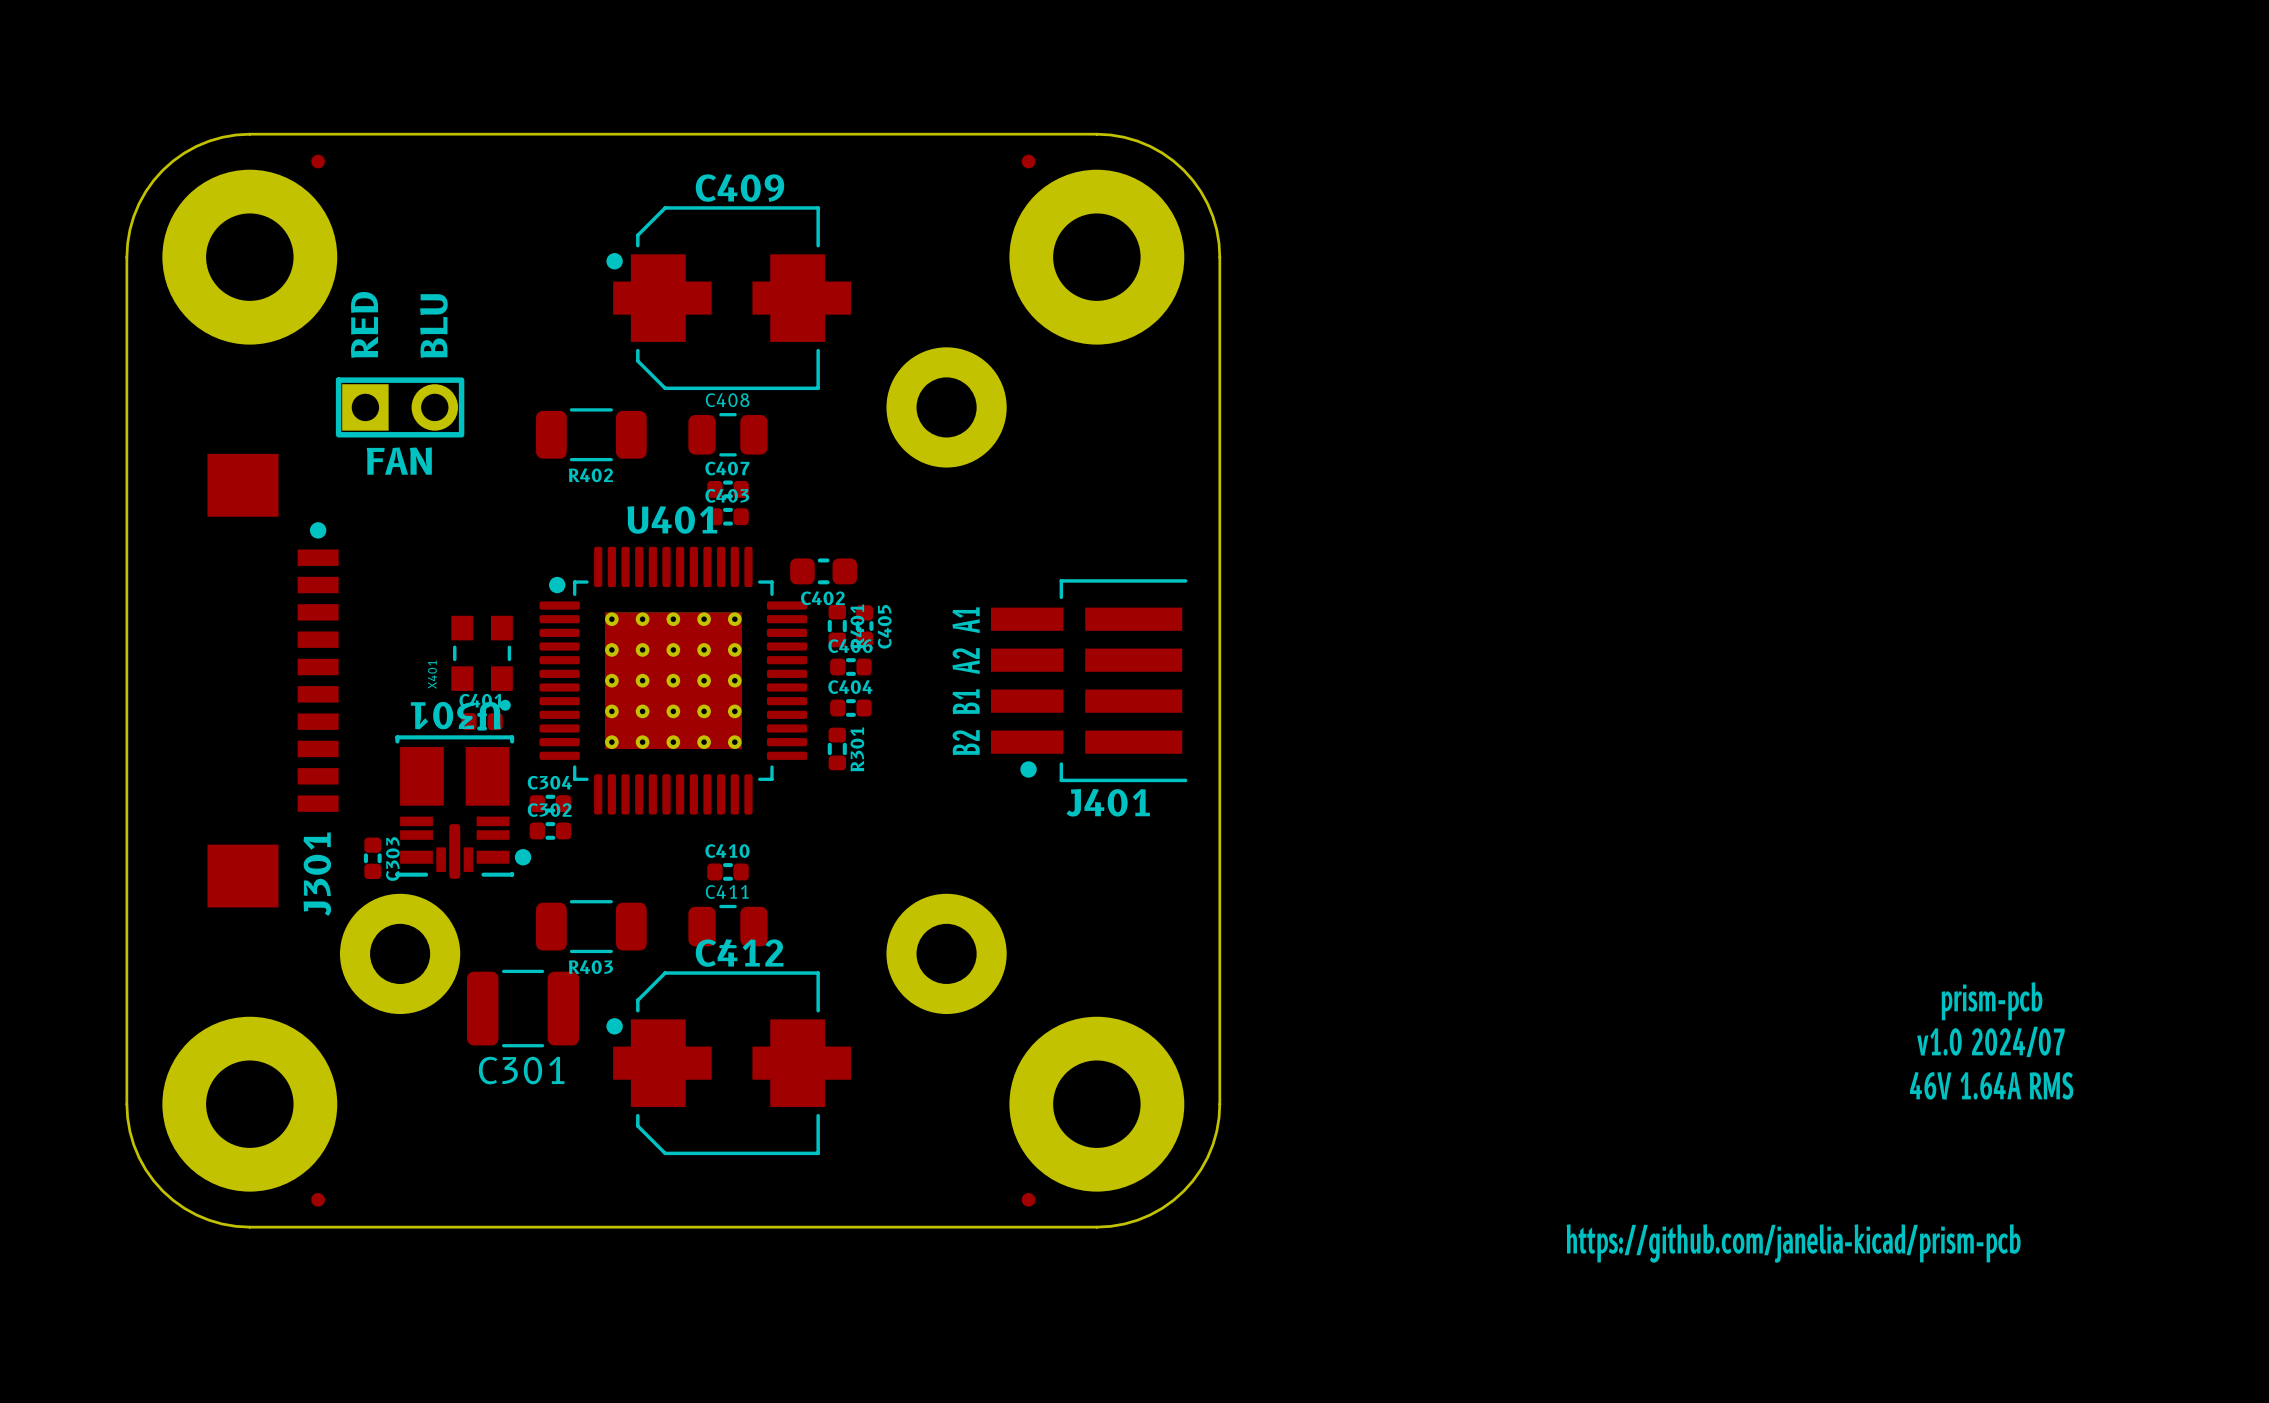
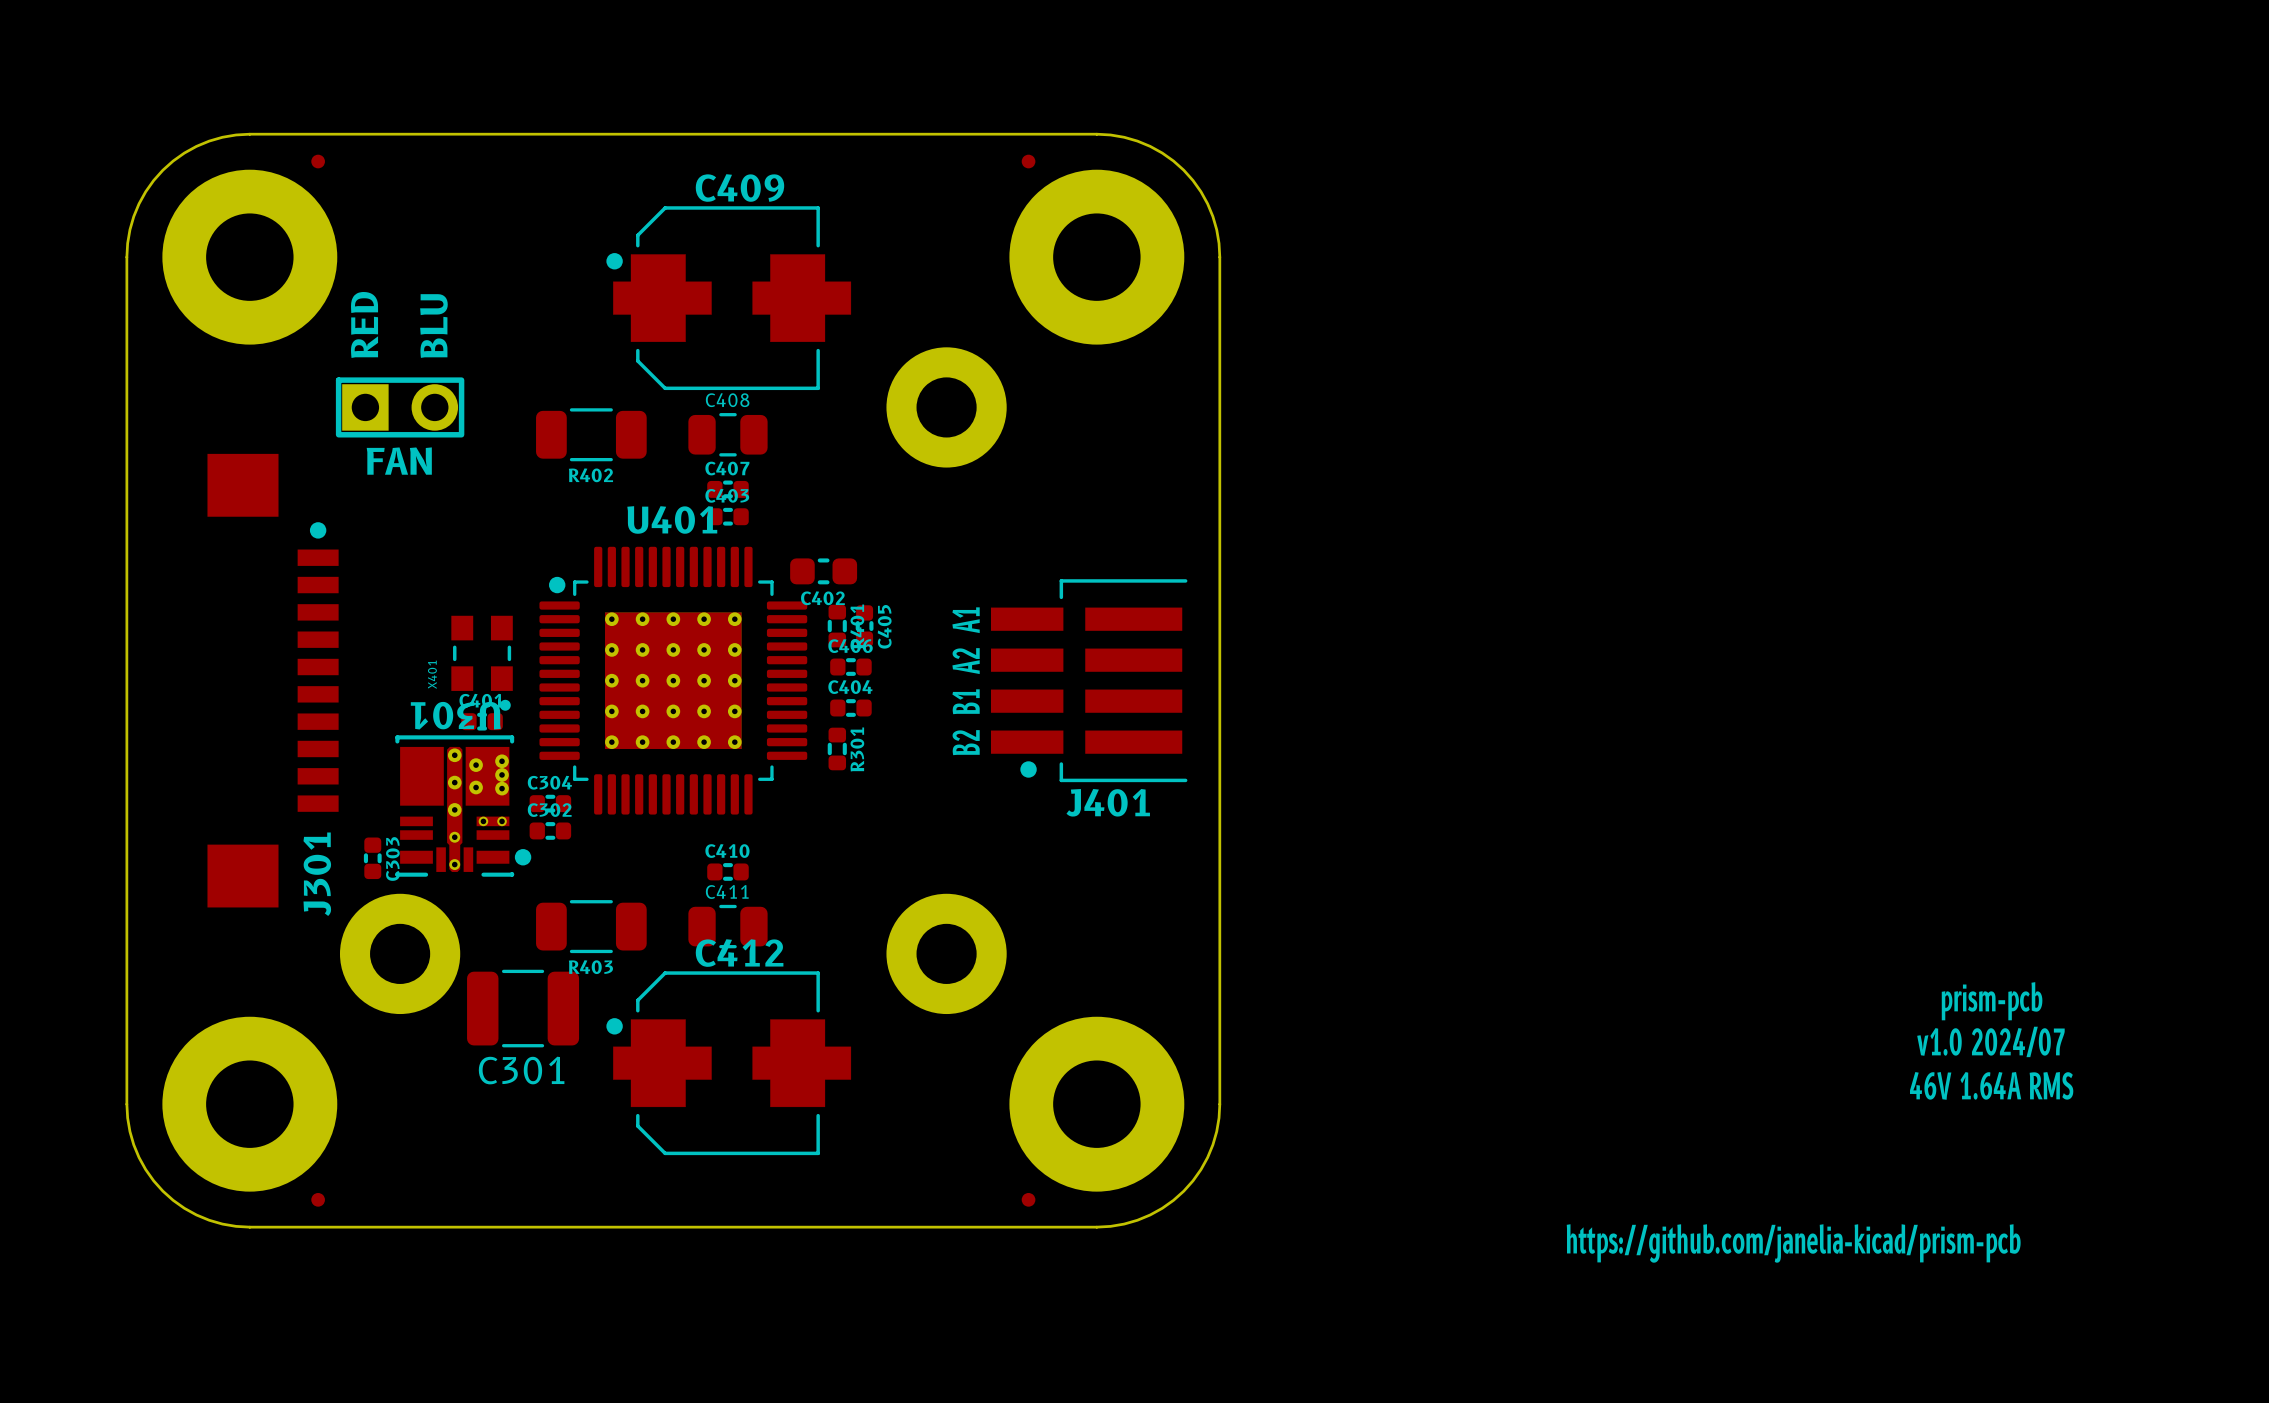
U301 footprint: [395, 735, 532, 879] -> [395, 735, 532, 877]

